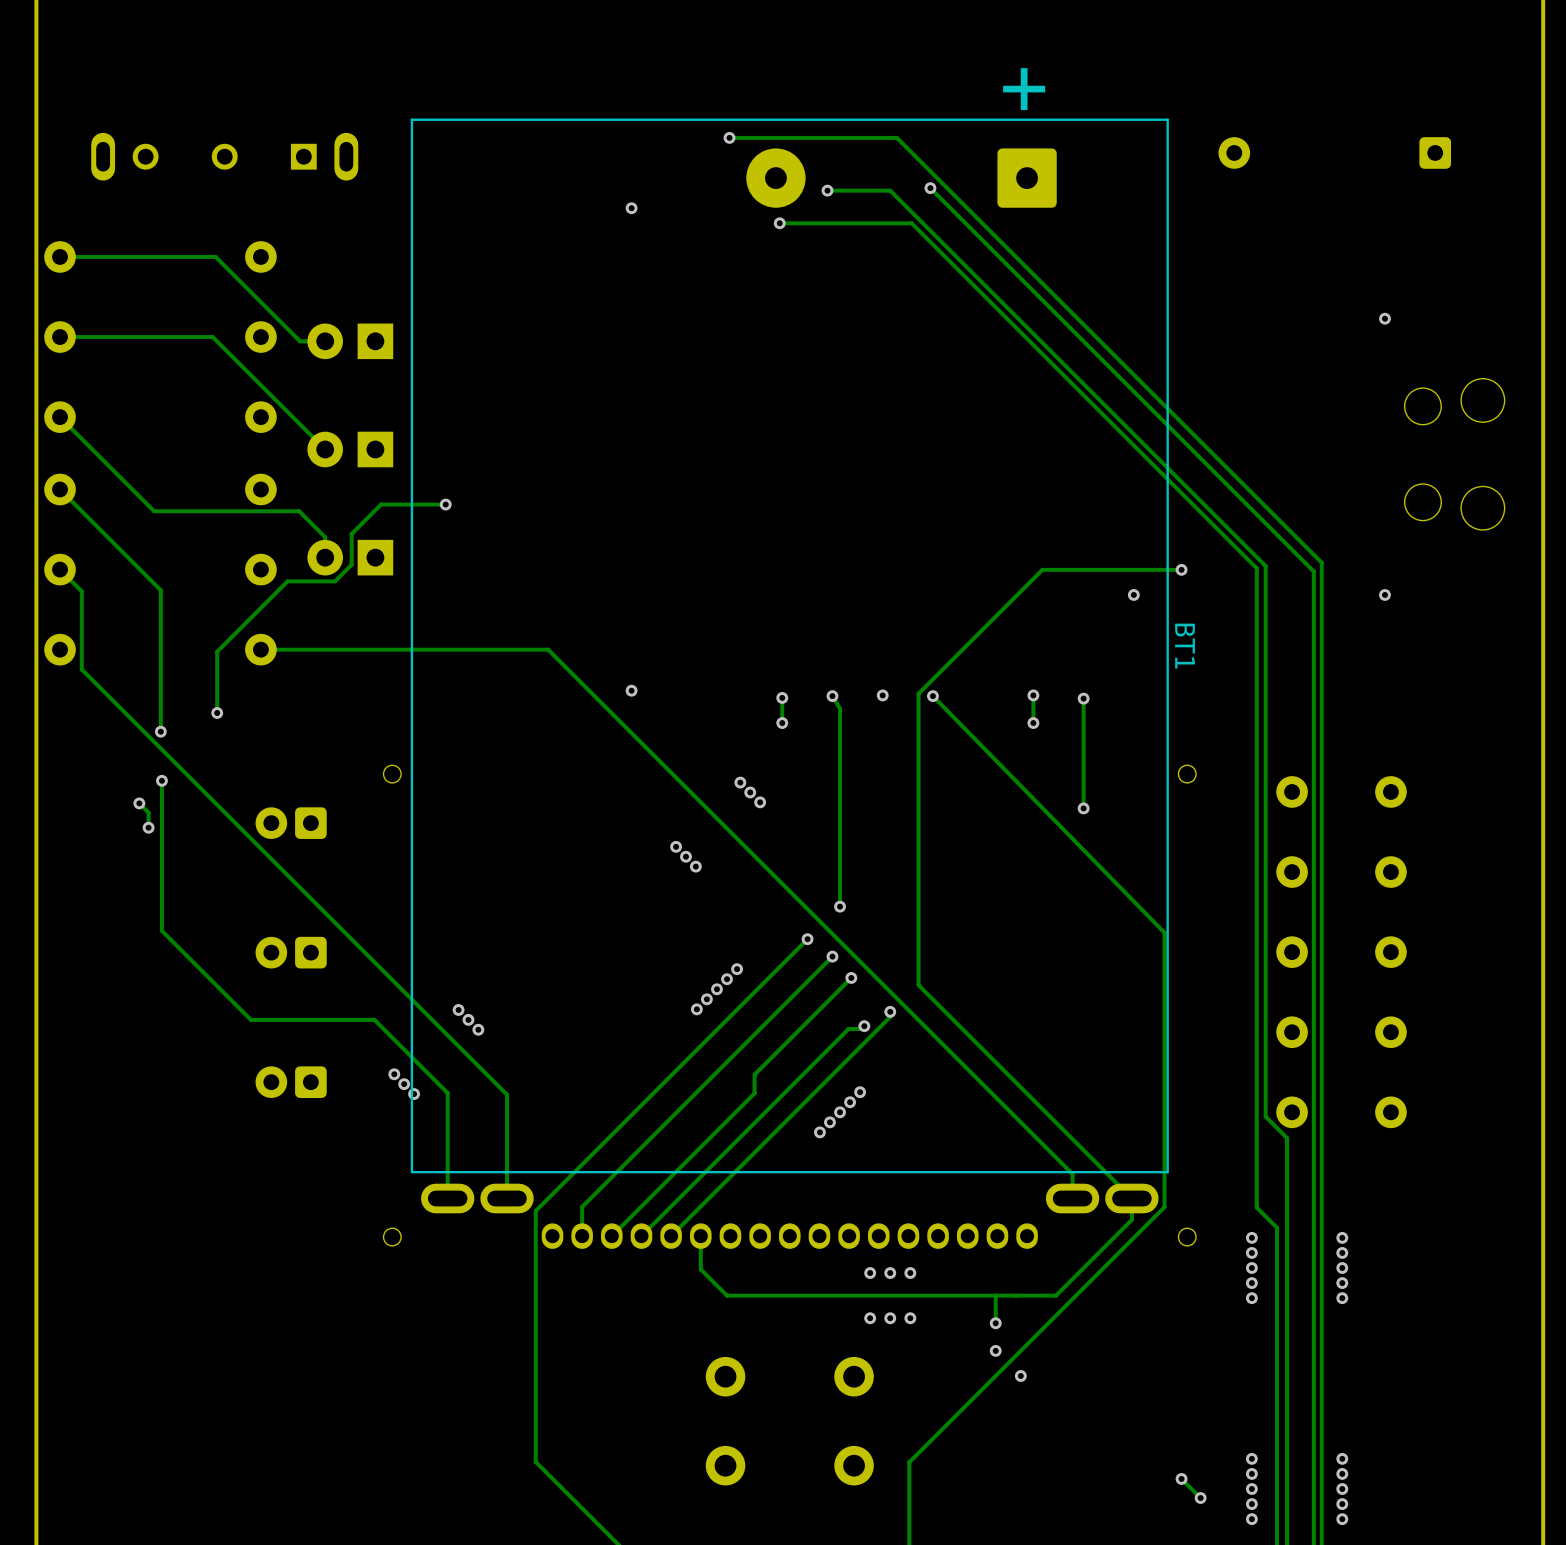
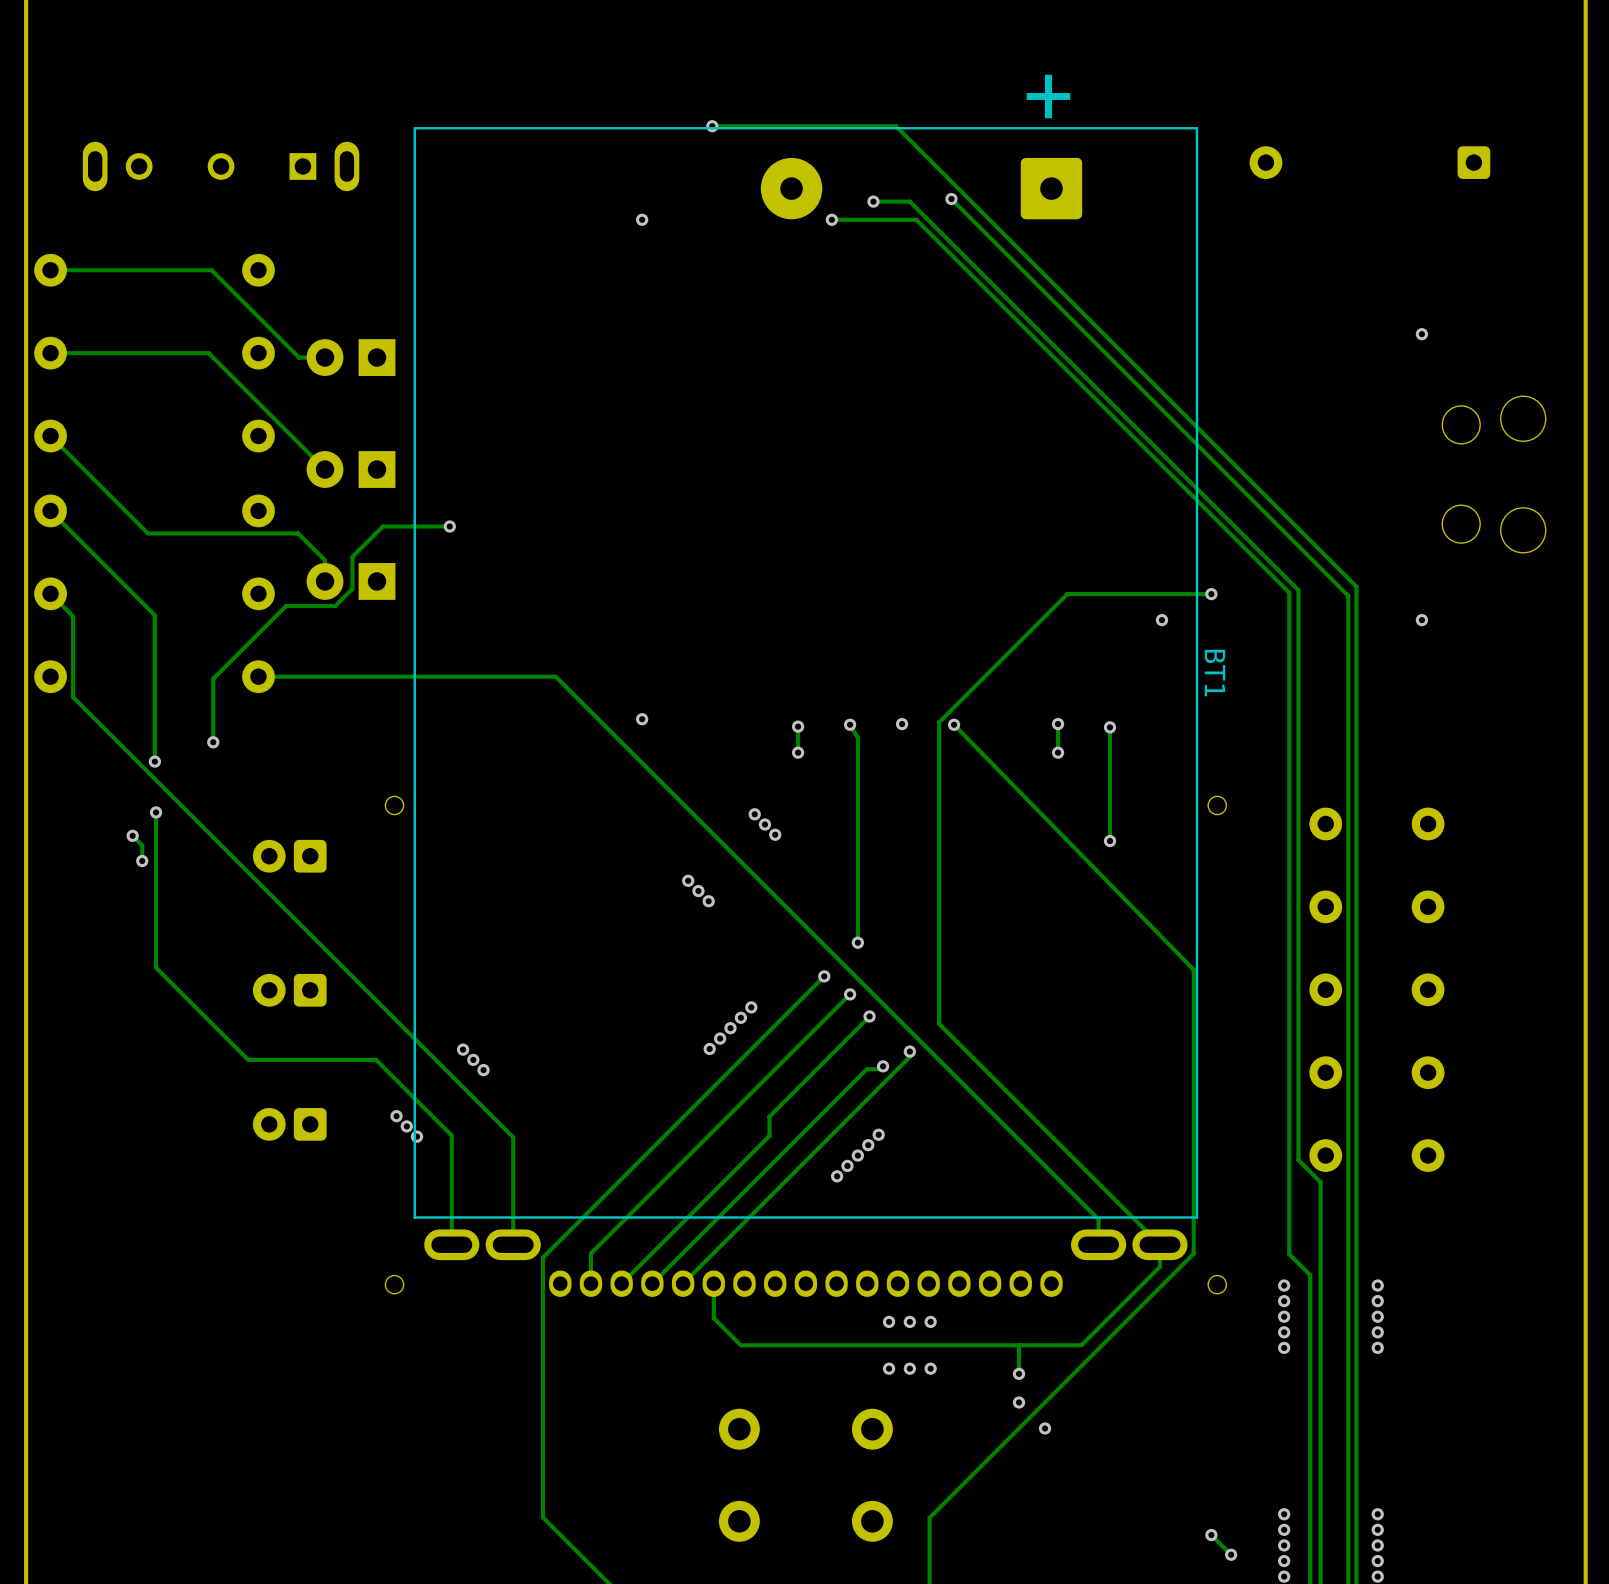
via position: (729, 137) -> (712, 126)
track: (896, 137) (729, 137) -> (916, 147) (896, 126) (712, 126)
via: (827, 190) -> none
track: (855, 190) (827, 190) -> none
via: none -> (873, 201)
via: none -> (831, 219)
via: (779, 223) -> none
track: (911, 223) (779, 223) -> (932, 235) (916, 219) (831, 219)

